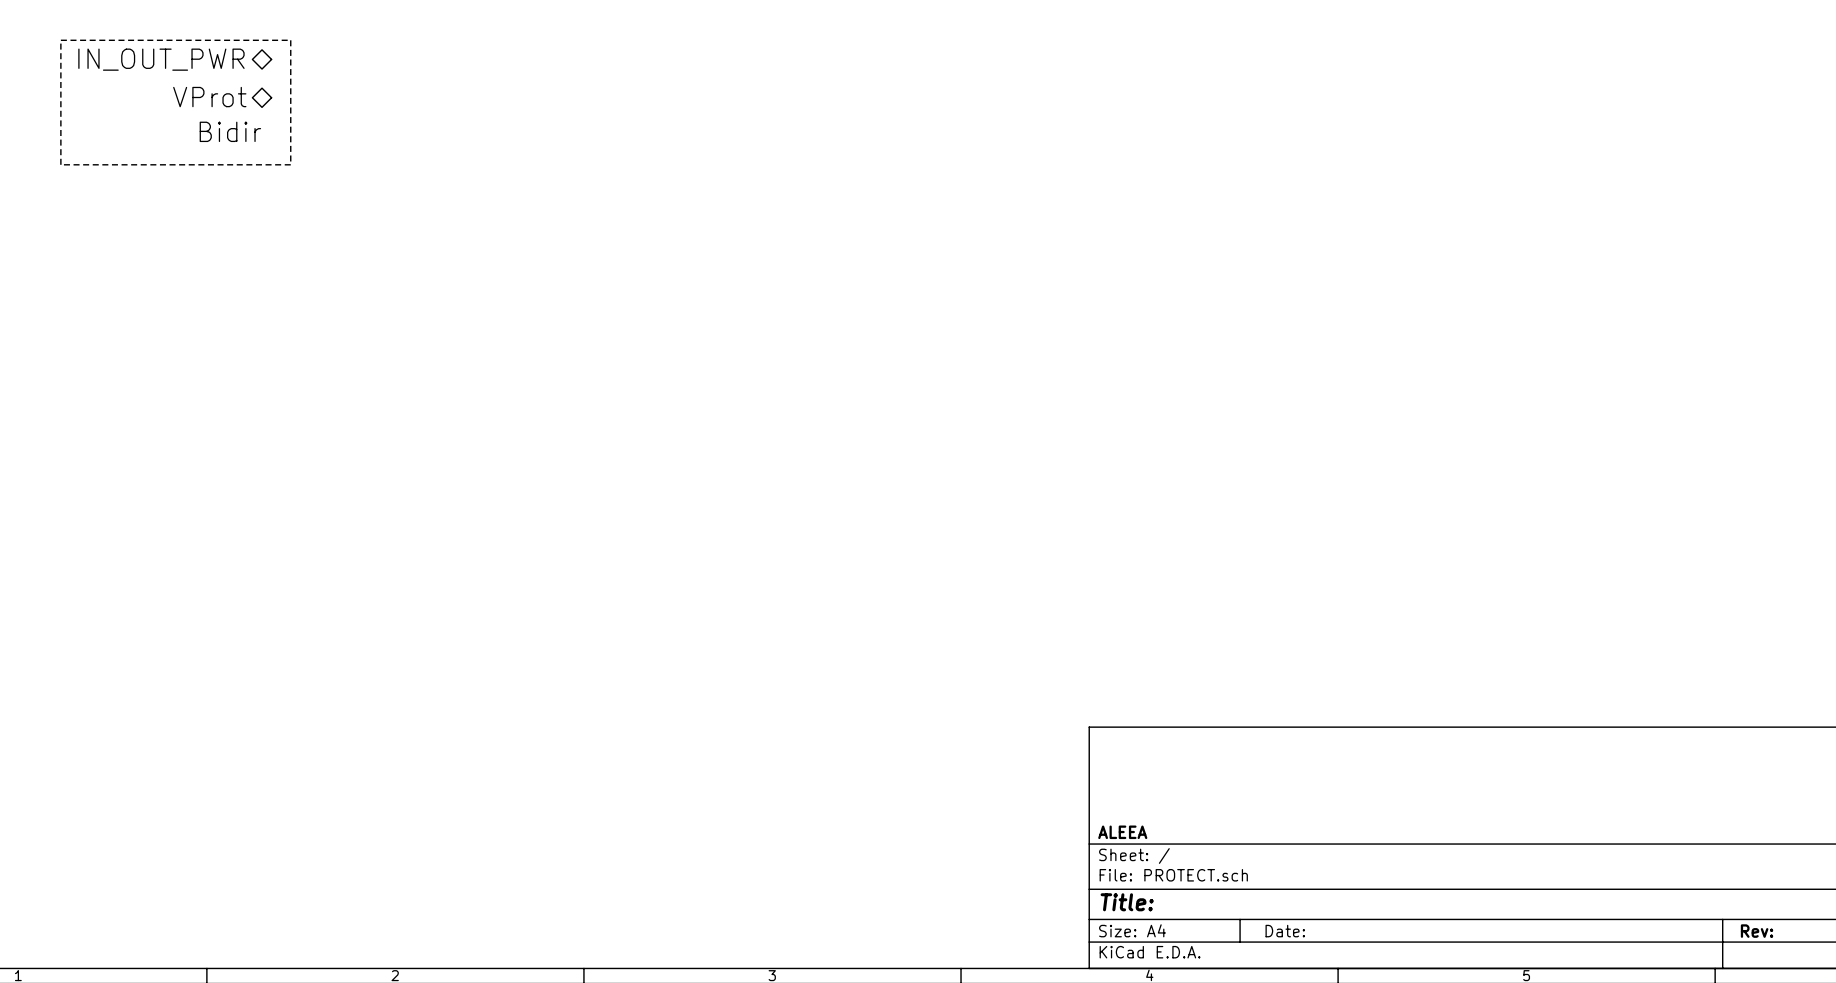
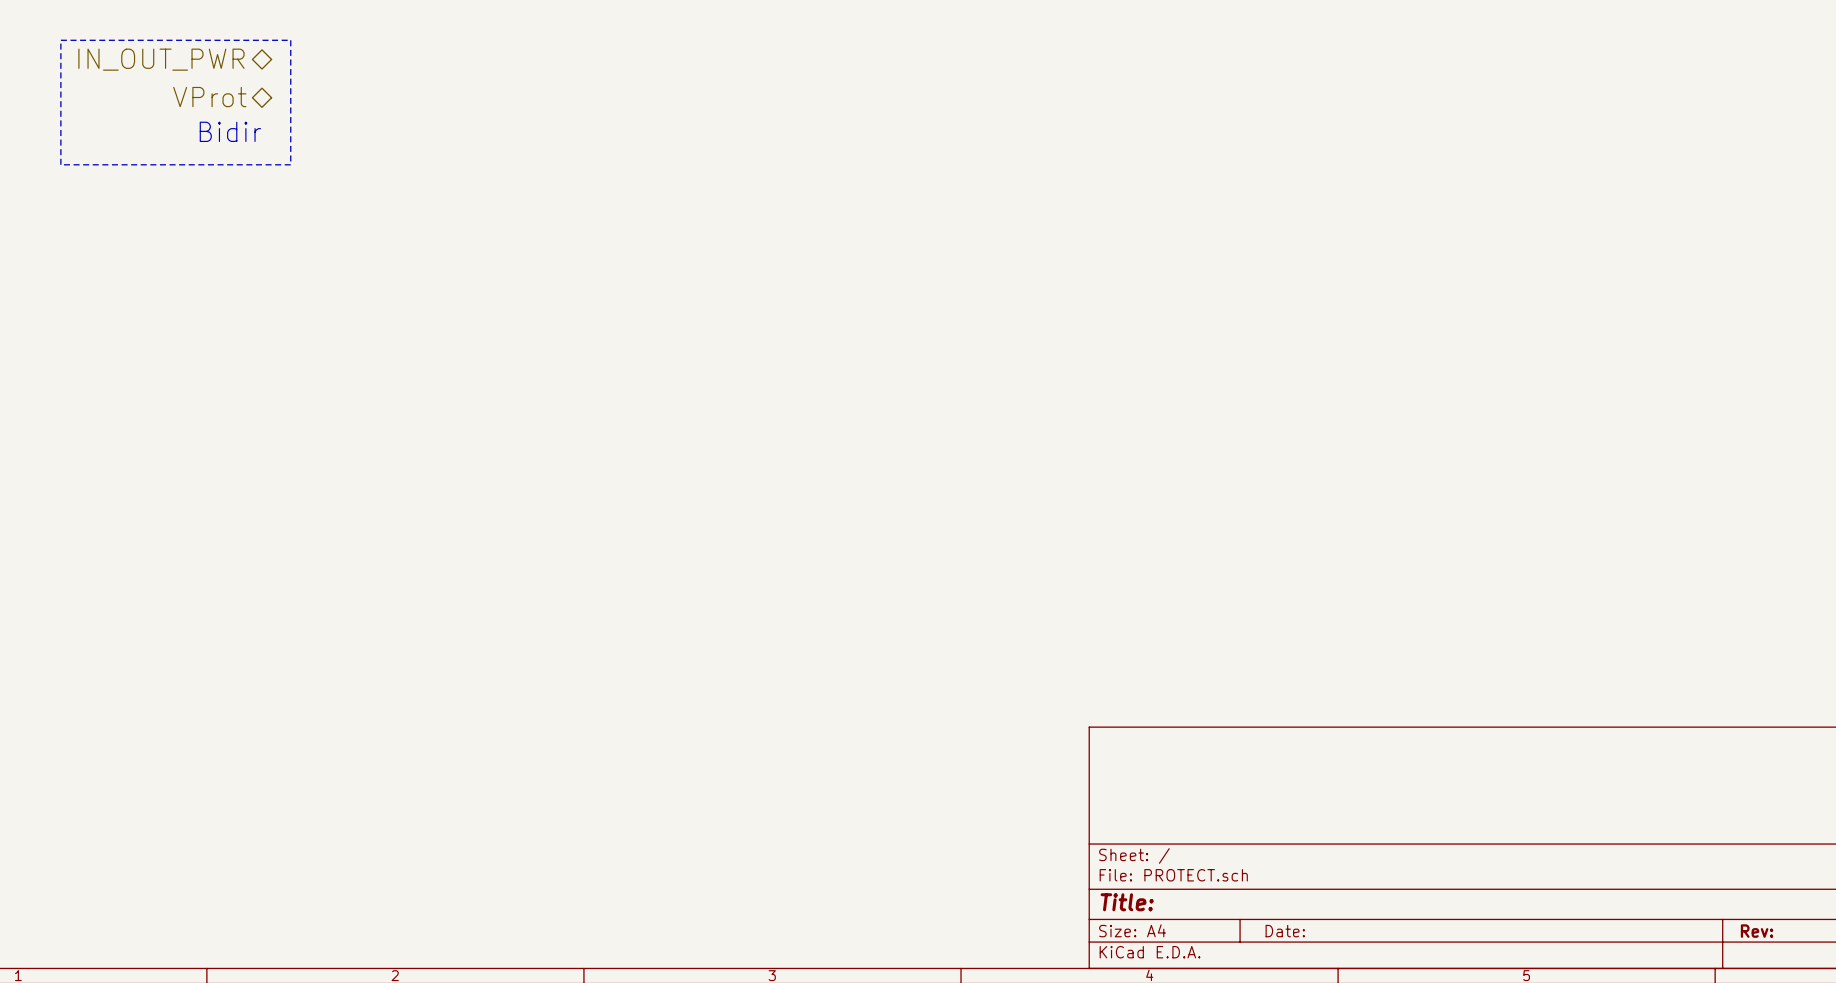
title block: ALEEA (1122, 832) -> none

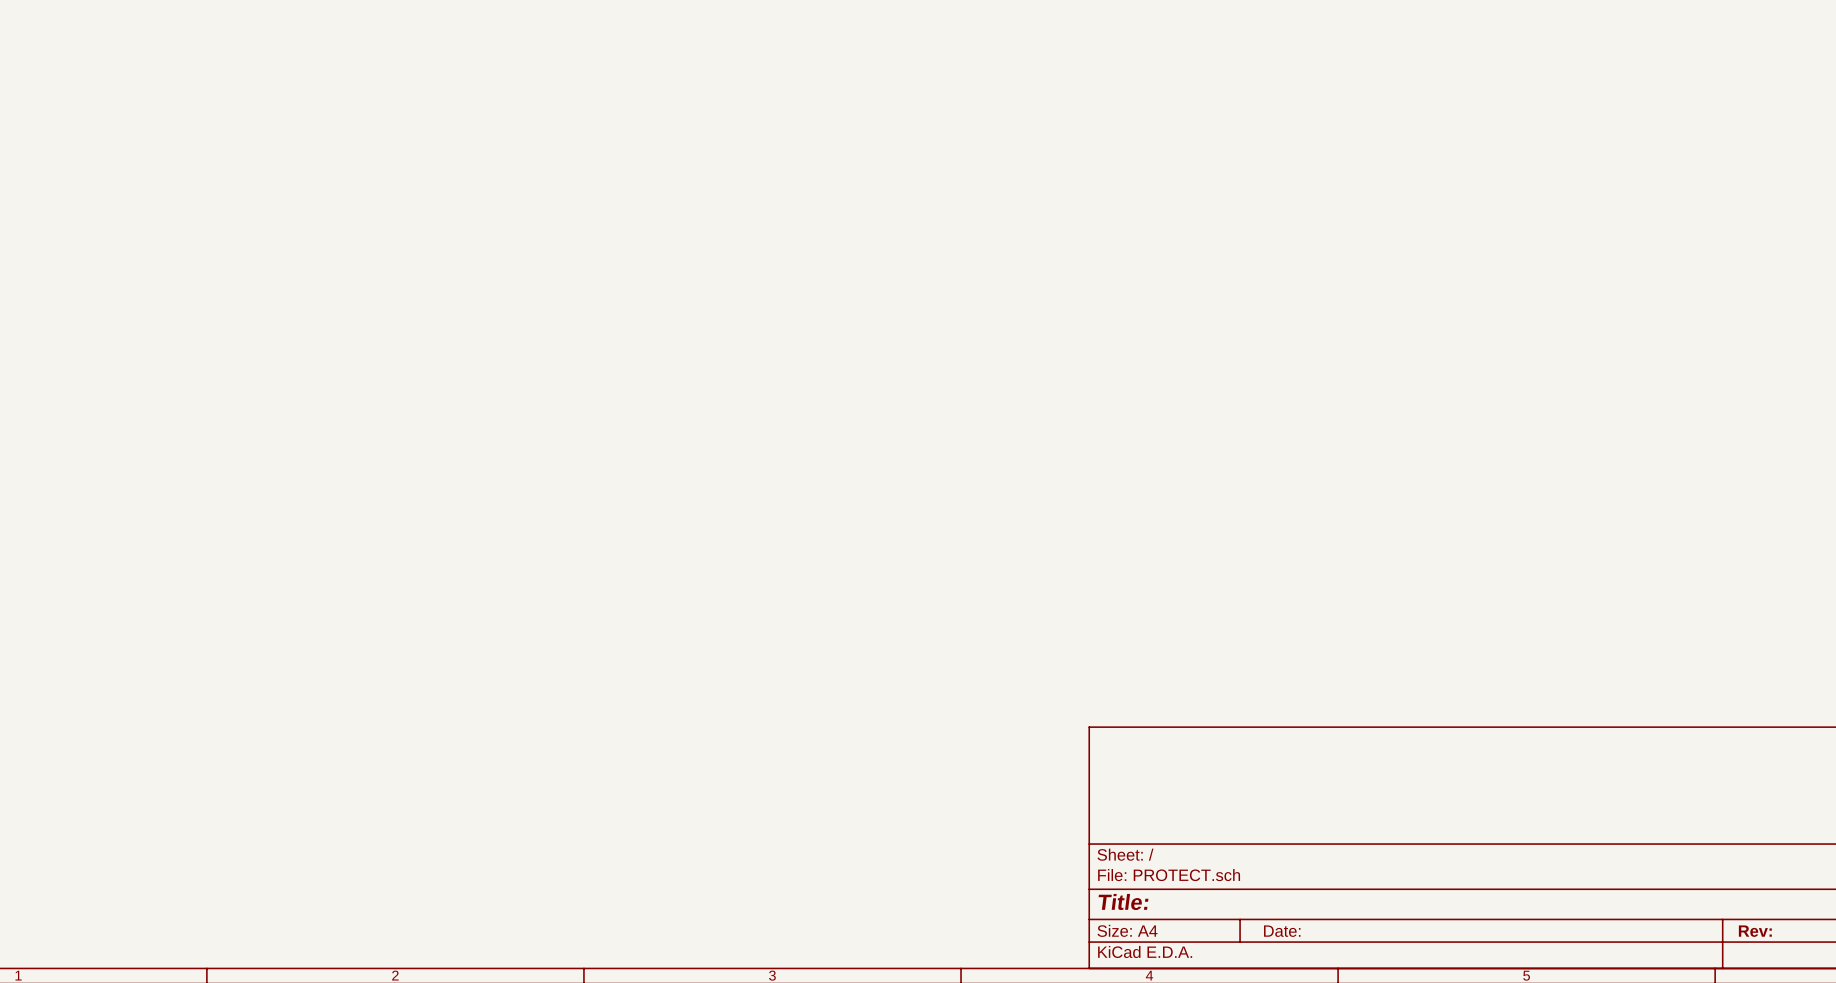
line: (60, 40) (60, 164) (290, 164) (290, 40) (60, 40) -> none
hierarchical label: IN_OUT_PWR (161, 59) -> none
hierarchical label: VProt (209, 97) -> none
text: Bidir (230, 131) -> none

